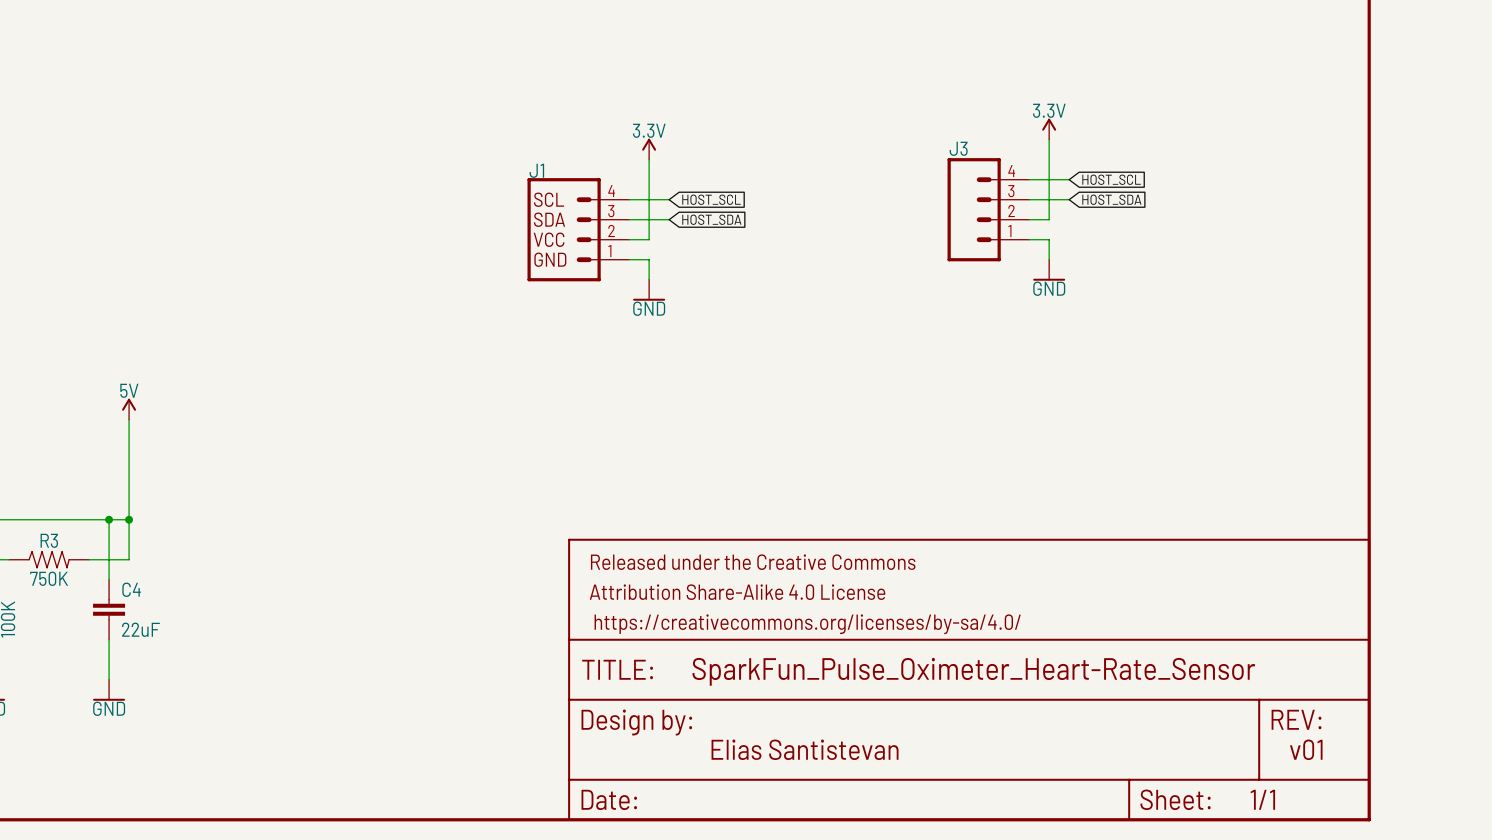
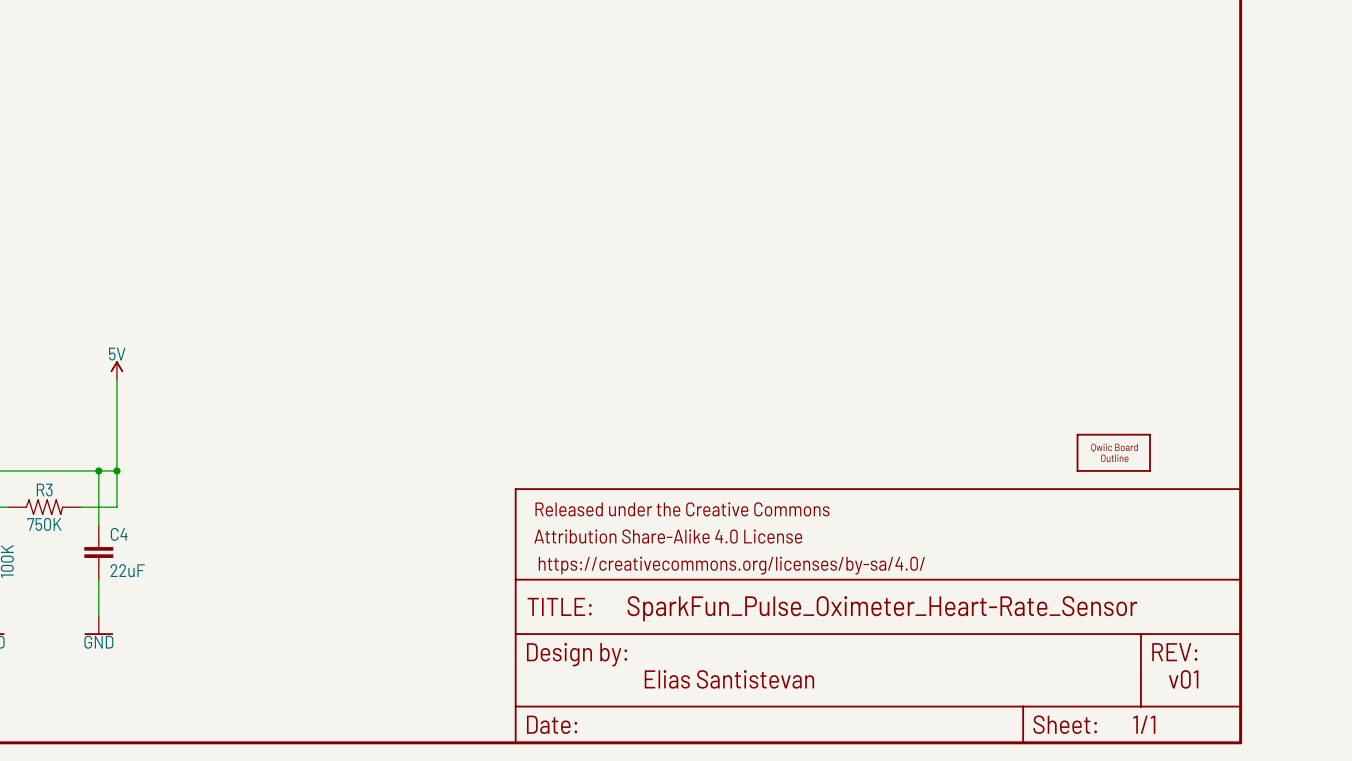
power symbol: 3.3V (1049, 129) -> none
wire: (1049, 139) (1049, 219) (1029, 219) -> none
power symbol: 3.3V (649, 149) -> none
wire: (649, 159) (649, 239) (629, 239) -> none
wire: (1029, 179) (1069, 179) -> none
global label: HOST_SCL (1111, 179) -> none
wire: (629, 199) (669, 199) -> none
global label: HOST_SCL (711, 199) -> none
wire: (1029, 199) (1069, 199) -> none
global label: HOST_SDA (1111, 199) -> none
J3: (988, 209) -> none
wire: (629, 219) (669, 219) -> none
global label: HOST_SDA (711, 219) -> none
J1: (578, 229) -> none
wire: (1029, 239) (1049, 239) (1049, 259) -> none
wire: (629, 259) (649, 259) (649, 279) -> none
power symbol: GND (1049, 270) -> none
power symbol: GND (649, 290) -> none
part: none -> (1113, 452)

